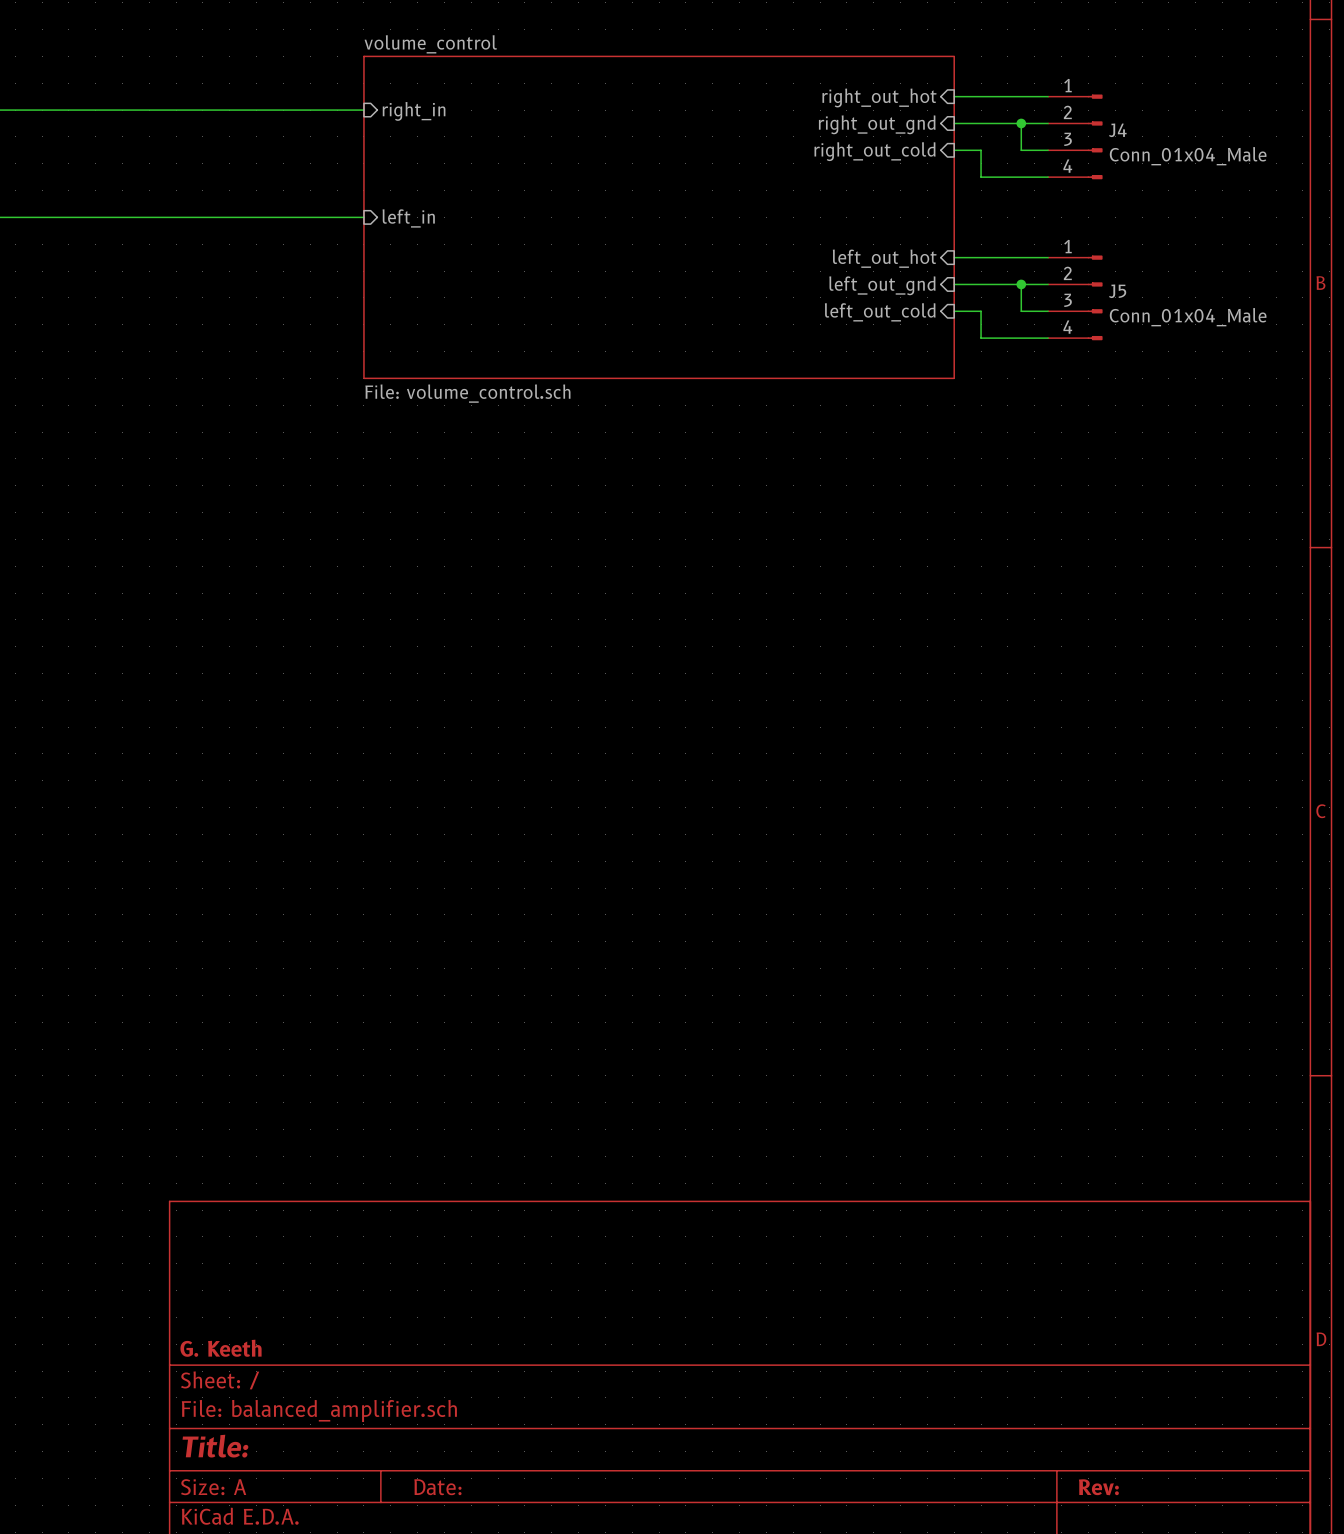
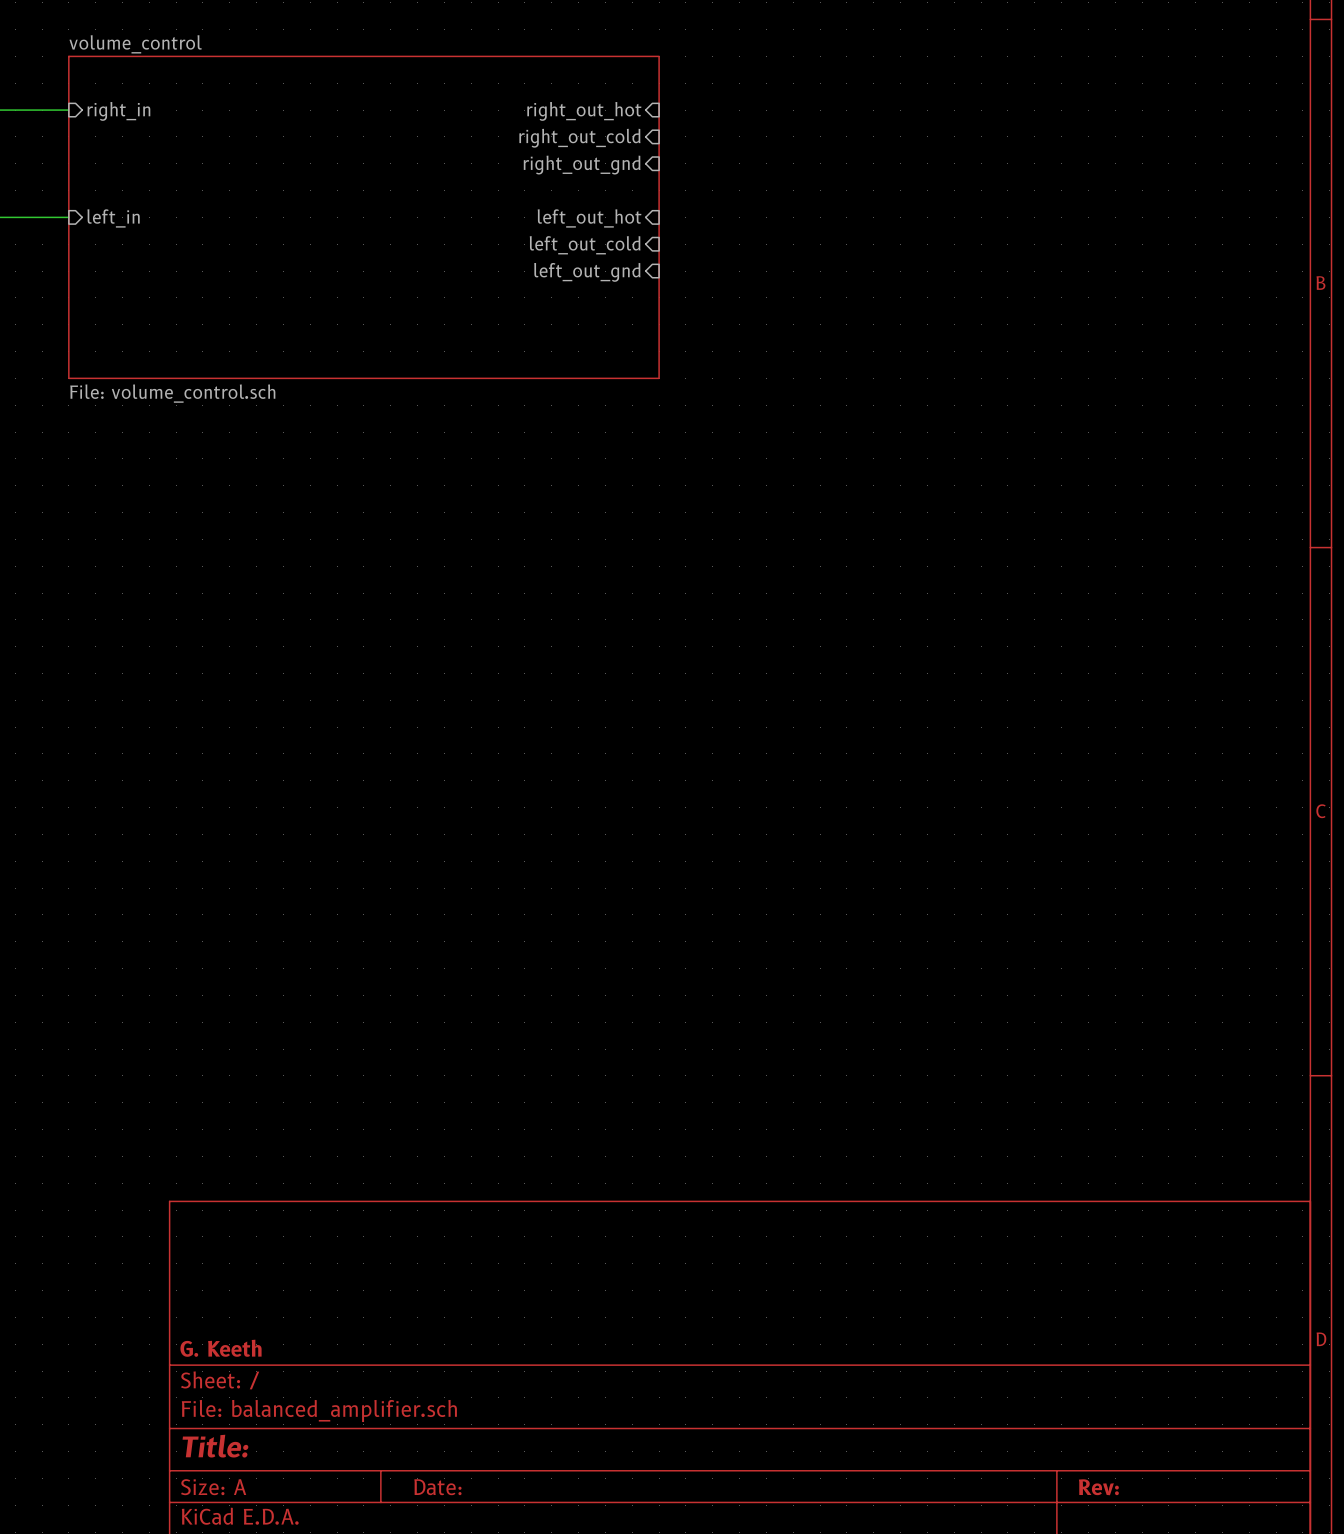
wire: (954, 96) (1048, 96) -> none
sheet pin: right_out_hot (879, 97) -> none
wire: (68, 110) (363, 110) -> none
sheet pin: none -> right_in (118, 111)
sheet pin: right_in (414, 111) -> none
sheet pin: none -> right_out_hot (584, 111)
wire: (954, 123) (1048, 123) -> none
wire: (1021, 123) (1021, 150) (1048, 150) -> none
junction: (1021, 123) -> none
sheet pin: right_out_gnd (877, 124) -> none
J4: Conn_01x04_Male (1075, 136) -> none
sheet pin: none -> right_out_cold (579, 138)
wire: (954, 150) (981, 150) (981, 177) (1048, 177) -> none
sheet pin: right_out_cold (875, 151) -> none
sheet pin: none -> right_out_gnd (582, 165)
wire: (68, 217) (363, 217) -> none
sheet volume_control: none -> File: volume_control.sch (363, 217)
sheet volume_control: File: volume_control.sch (659, 217) -> none
sheet pin: none -> left_in (113, 218)
sheet pin: left_in (408, 218) -> none
sheet pin: none -> left_out_hot (589, 218)
sheet pin: none -> left_out_cold (585, 245)
wire: (954, 257) (1048, 257) -> none
sheet pin: left_out_hot (884, 258) -> none
sheet pin: none -> left_out_gnd (587, 272)
wire: (954, 284) (1048, 284) -> none
wire: (1021, 284) (1021, 311) (1048, 311) -> none
junction: (1021, 284) -> none
sheet pin: left_out_gnd (882, 285) -> none
J5: Conn_01x04_Male (1075, 297) -> none
wire: (954, 311) (981, 311) (981, 338) (1048, 338) -> none
sheet pin: left_out_cold (880, 312) -> none

